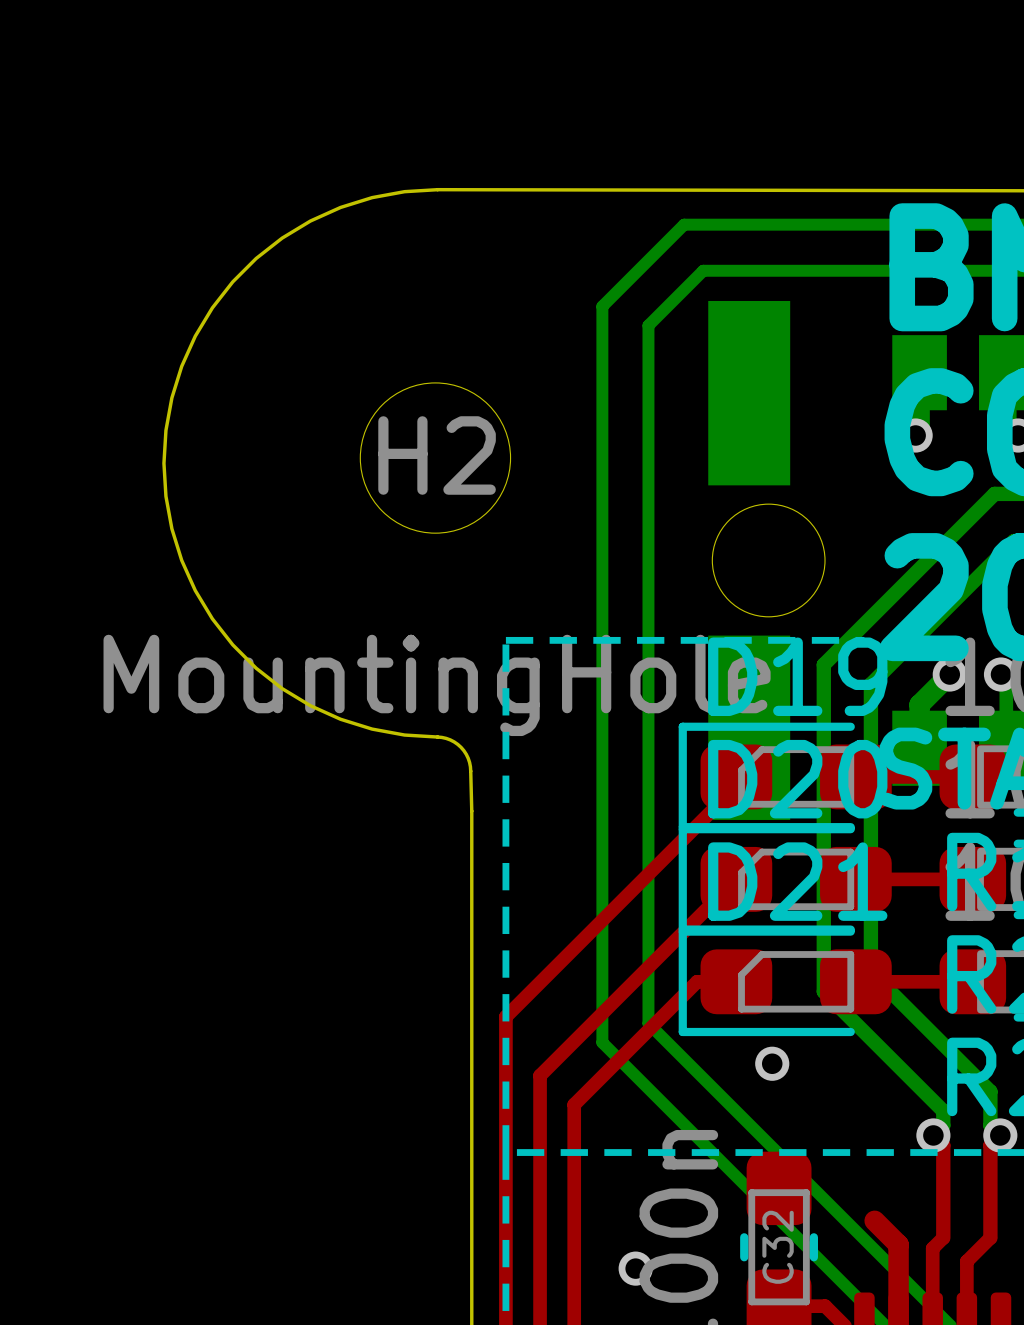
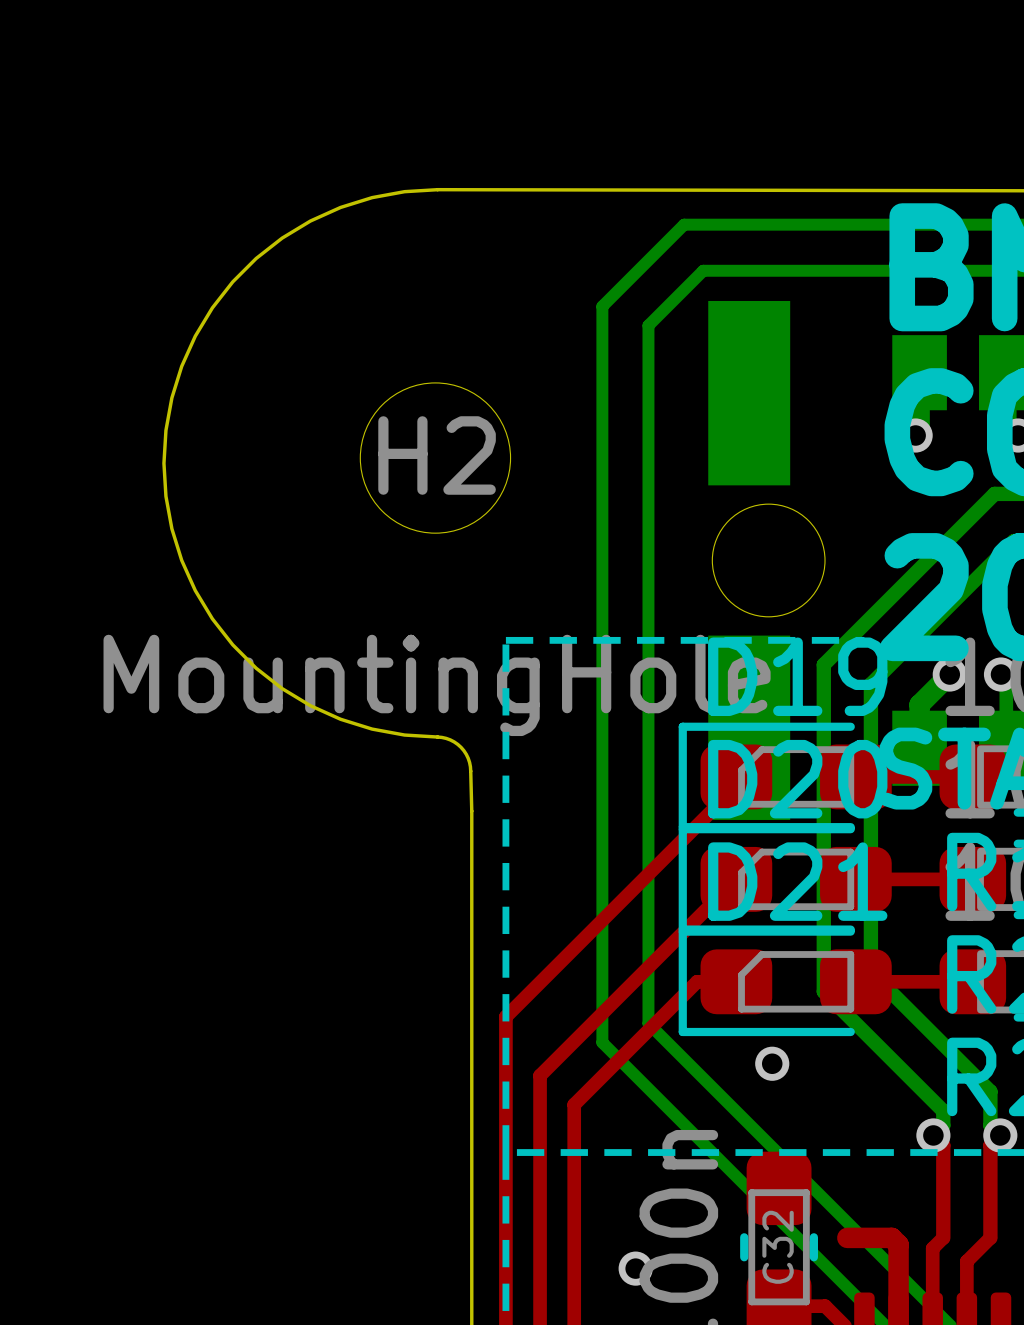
top track: (874, 1220) (891, 1237) -> (847, 1237) (891, 1237)

